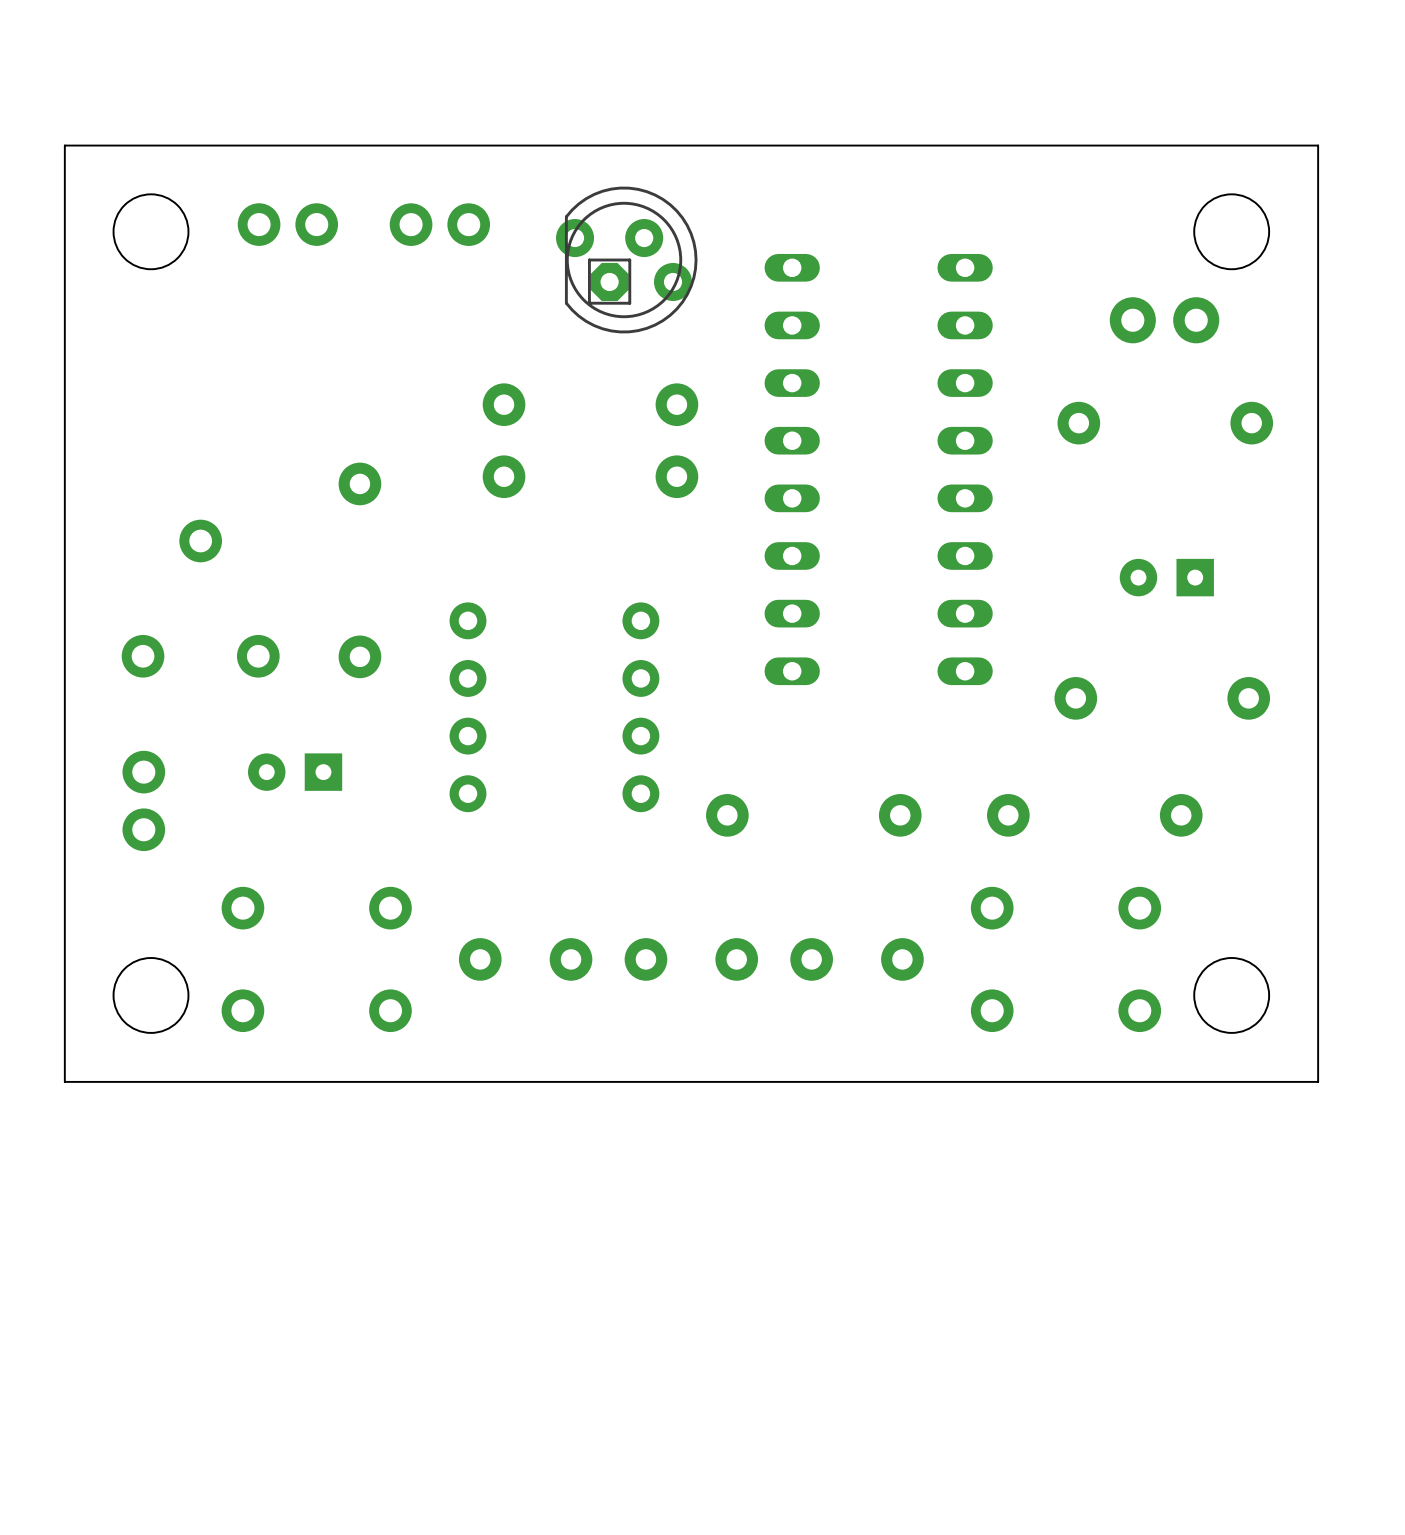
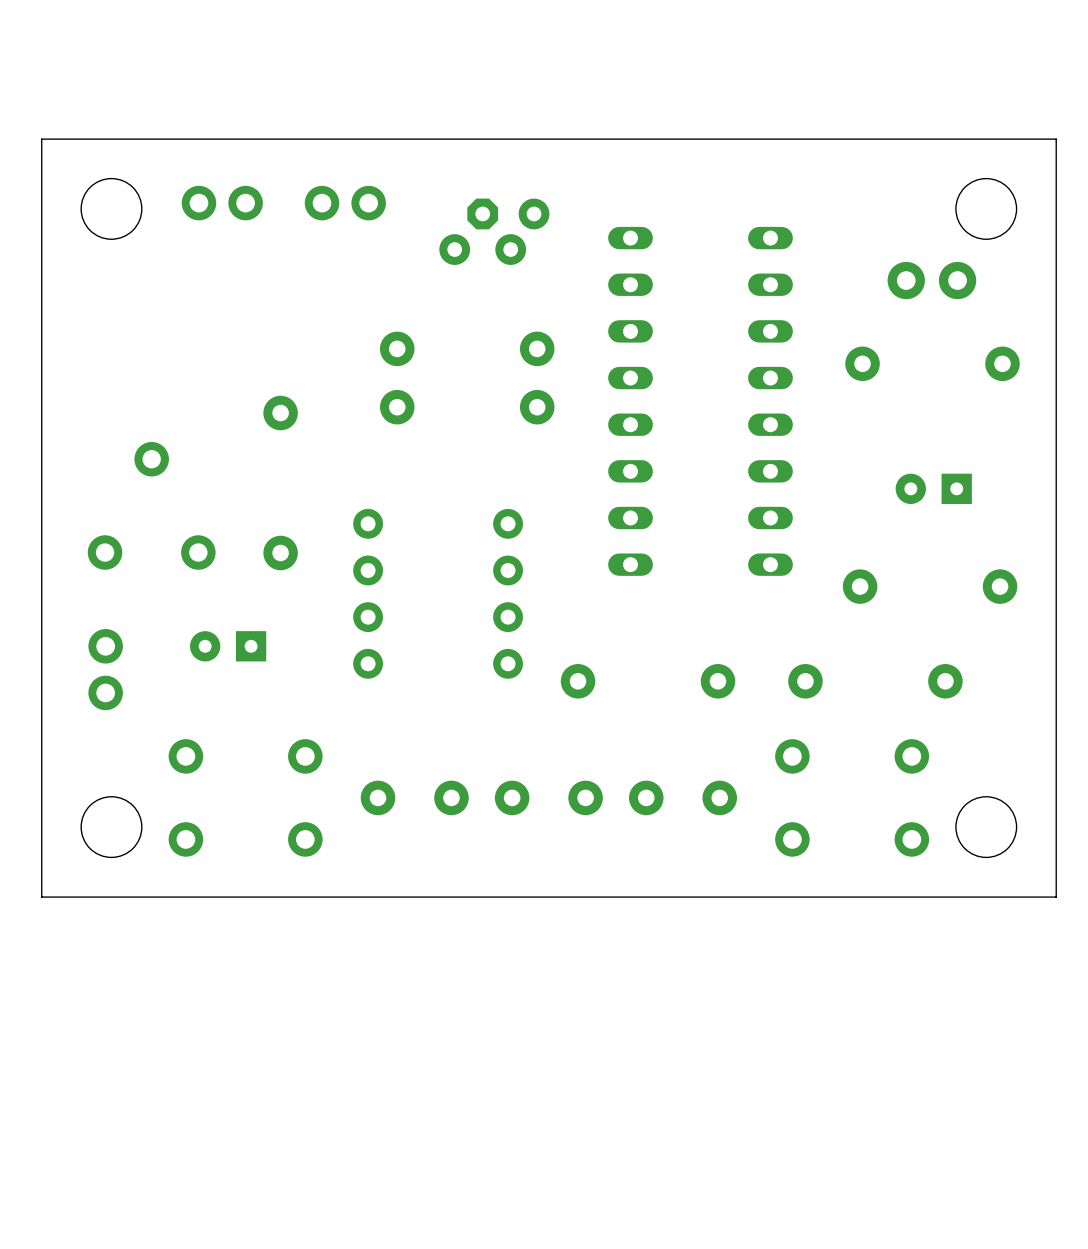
part side: top (626, 260) -> bottom (494, 231)

